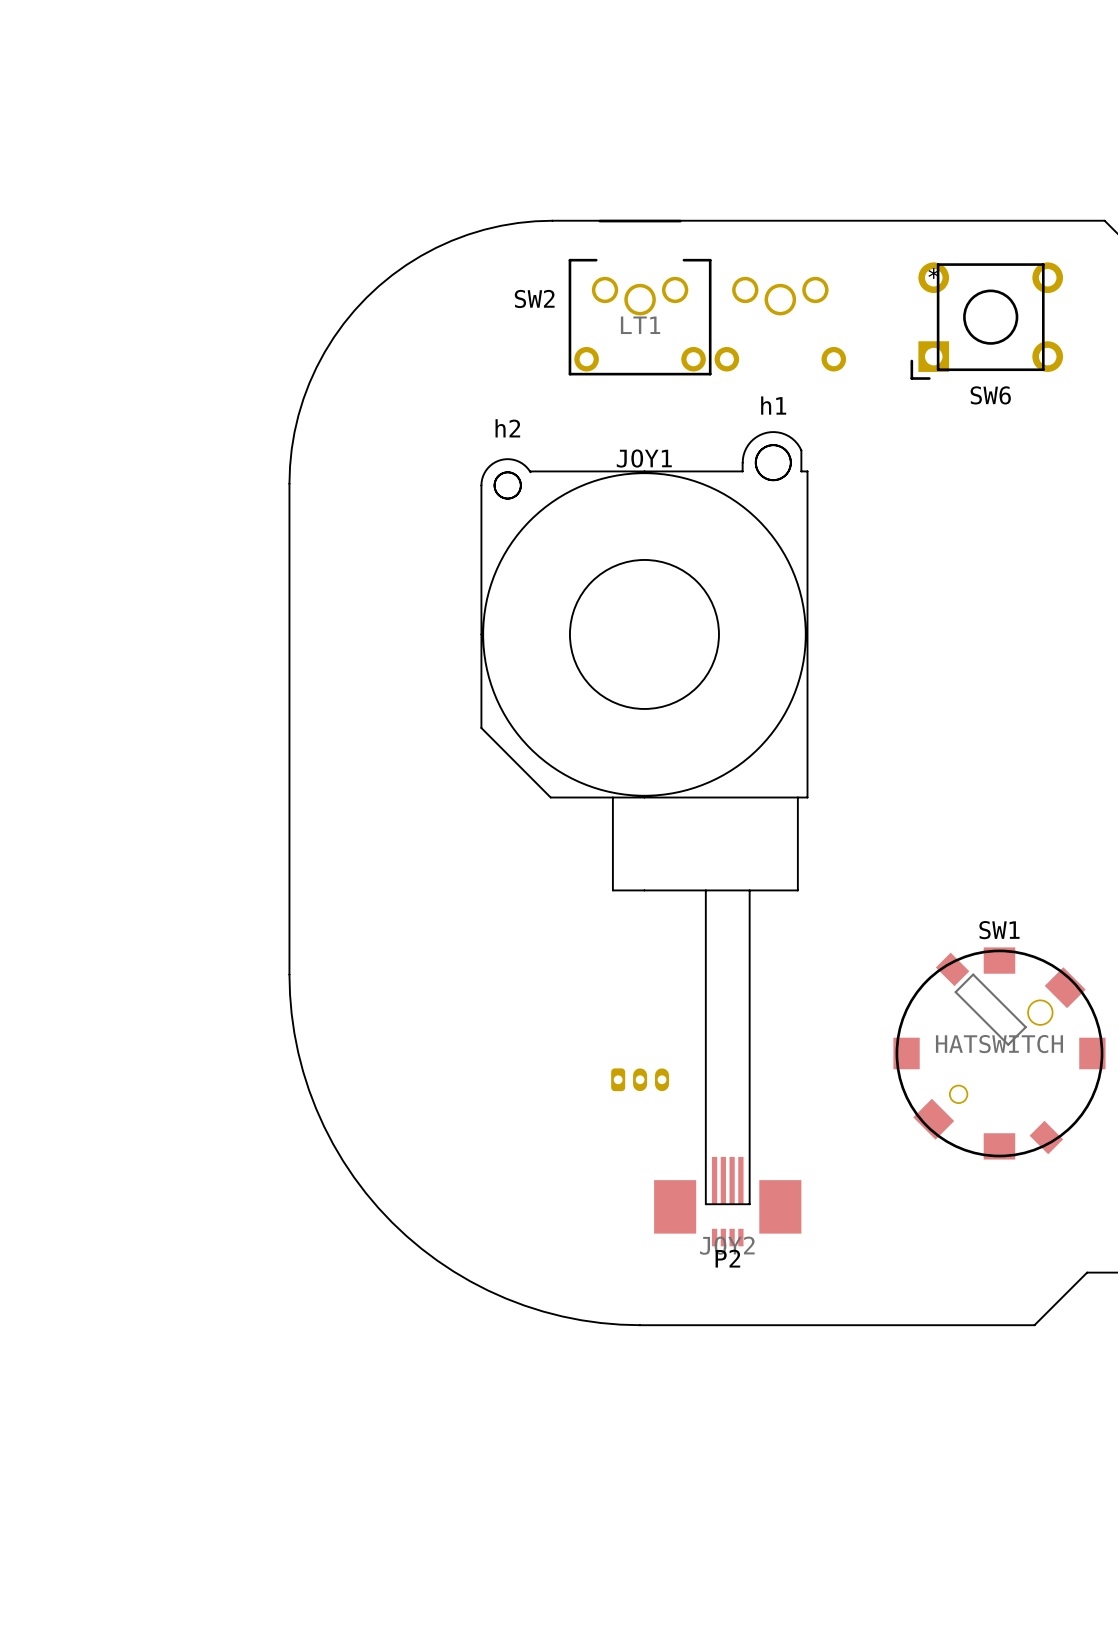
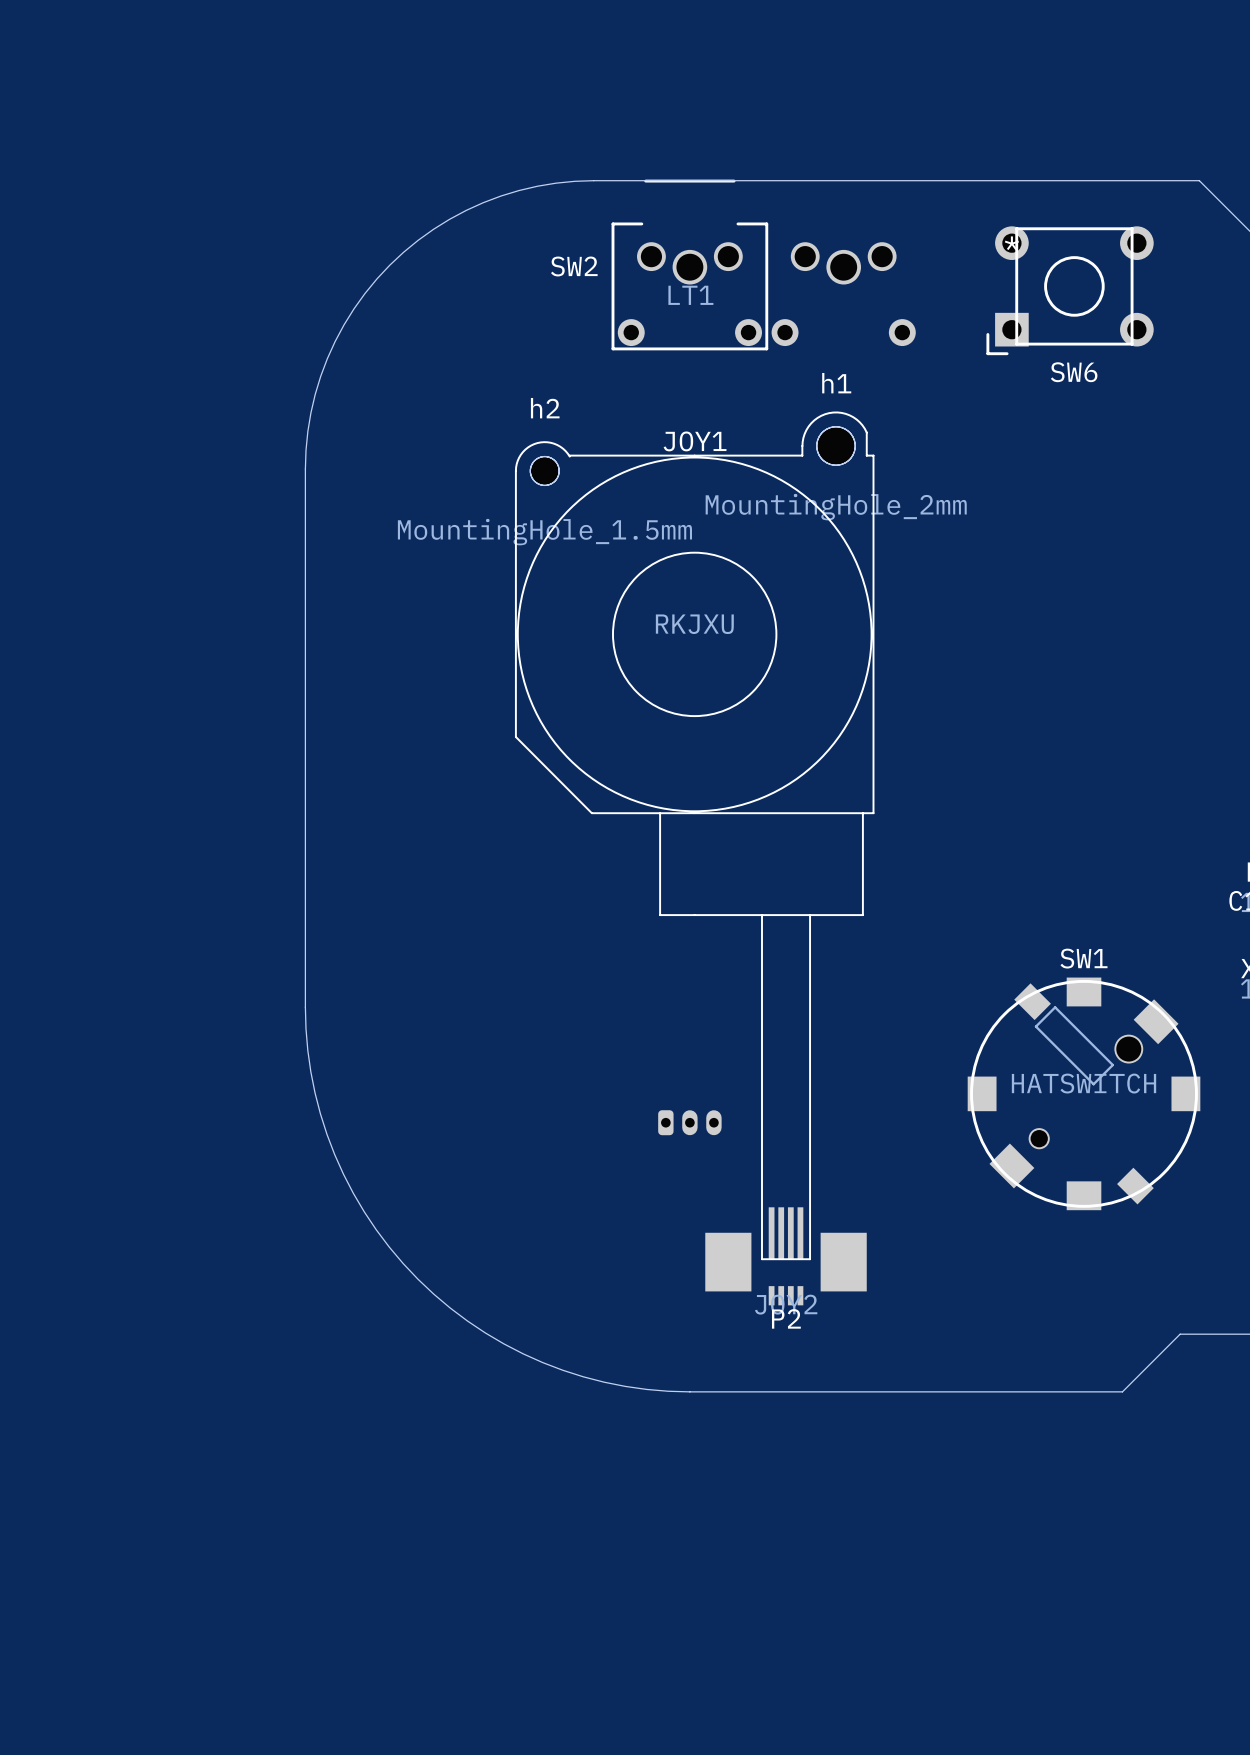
h1 value: none -> MountingHole_2mm (836, 507)
h2 value: none -> MountingHole_1.5mm (544, 532)
JOY1 value: none -> RKJXU (694, 624)

